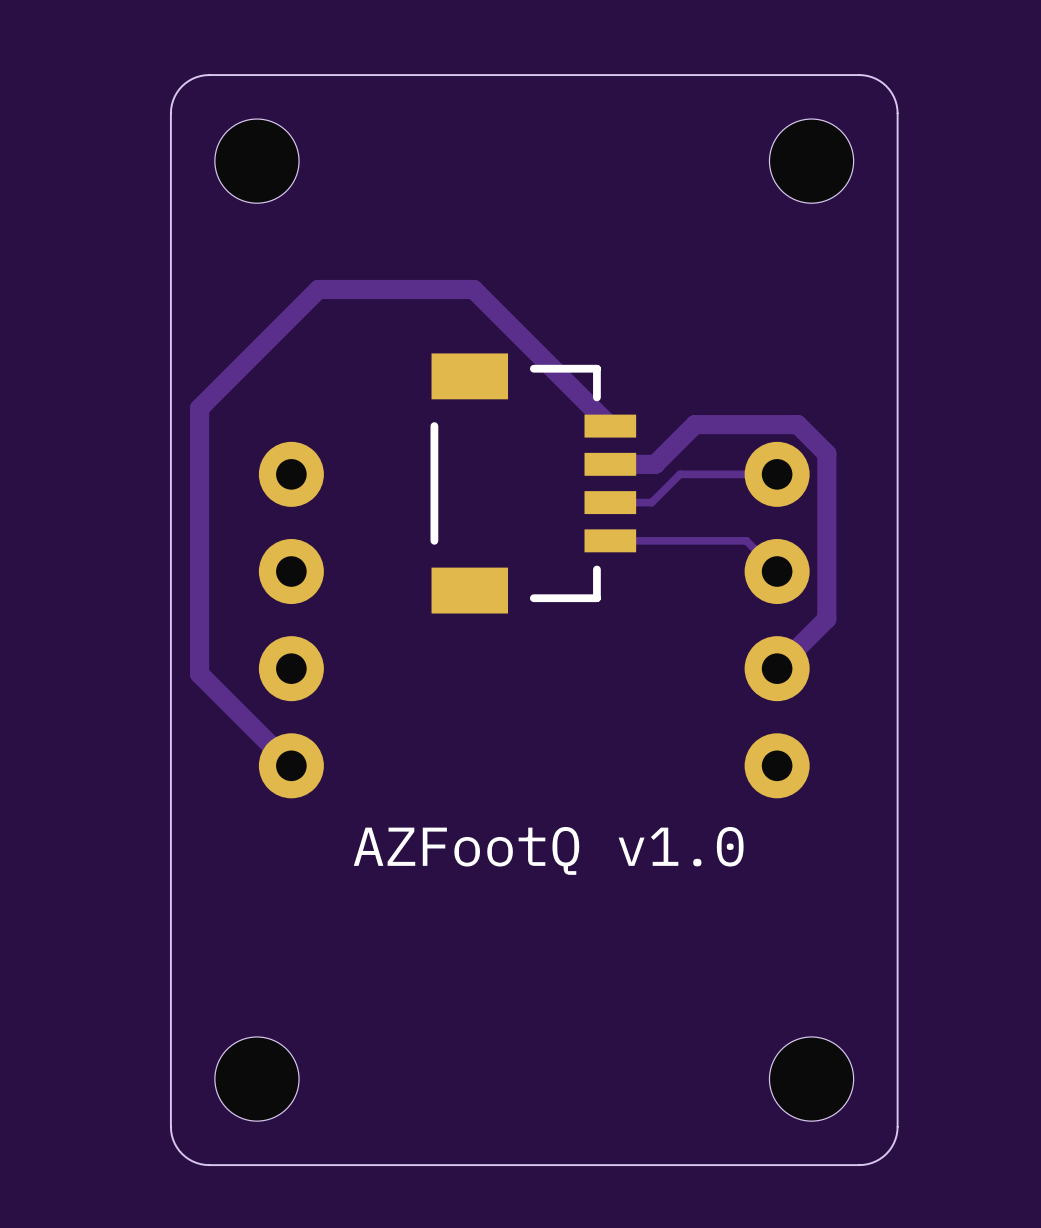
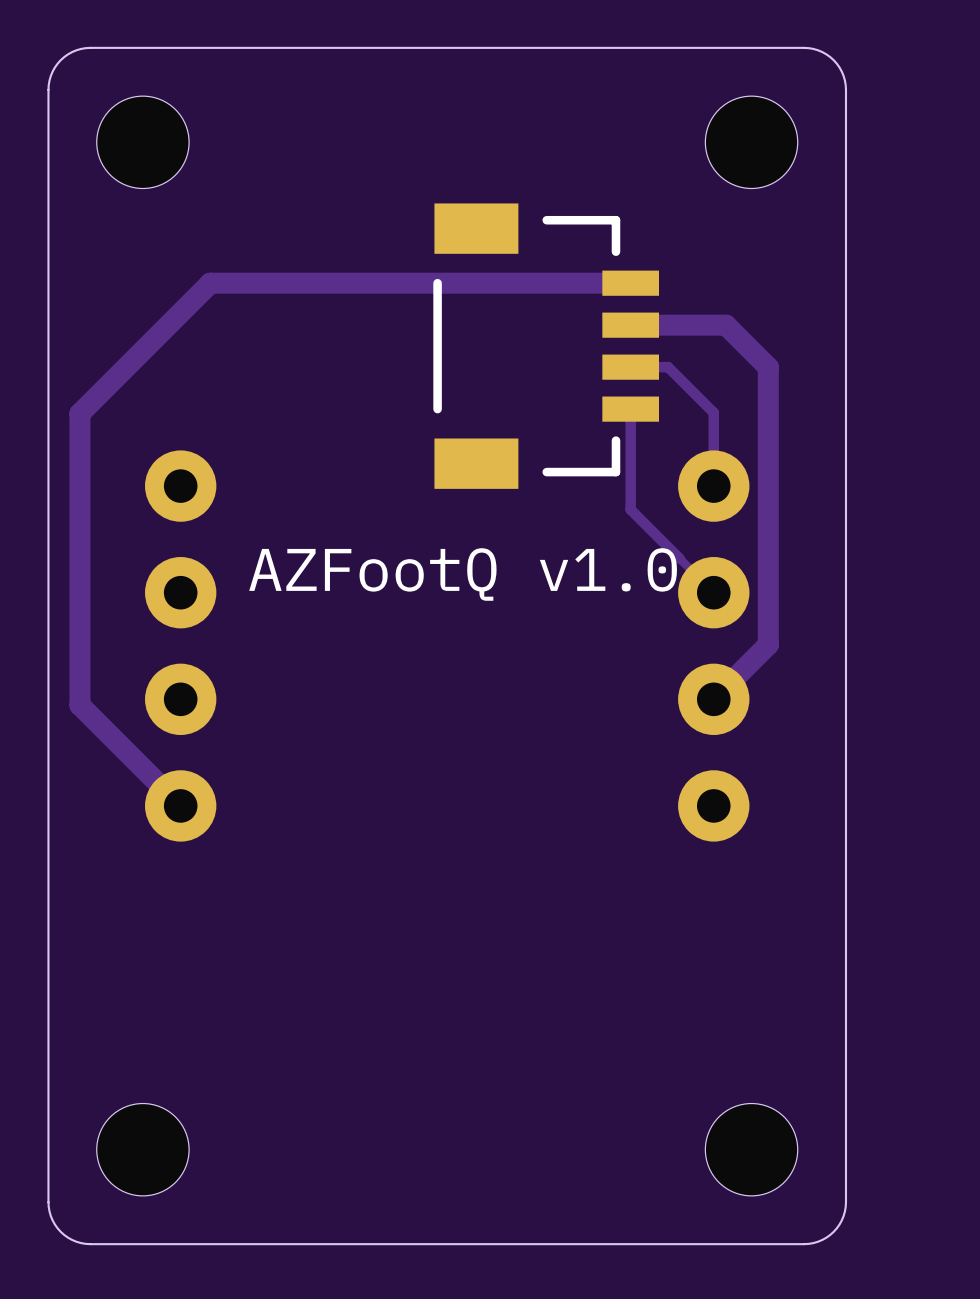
track: (473, 289) (610, 426) -> (380, 283) (630, 283)
track: (826, 453) (797, 424) (695, 424) (655, 464) (610, 464) -> (768, 463) (768, 367) (726, 325) (630, 325)
track: (777, 474) (679, 474) (651, 502) (610, 502) -> (713, 486) (713, 412) (668, 367) (630, 367)
part position: (533, 483) -> (546, 346)
track: (746, 540) (610, 540) -> (680, 559) (630, 509) (630, 409)
text position: AZFootQ v1.0 (548, 850) -> AZFootQ v1.0 (463, 574)

